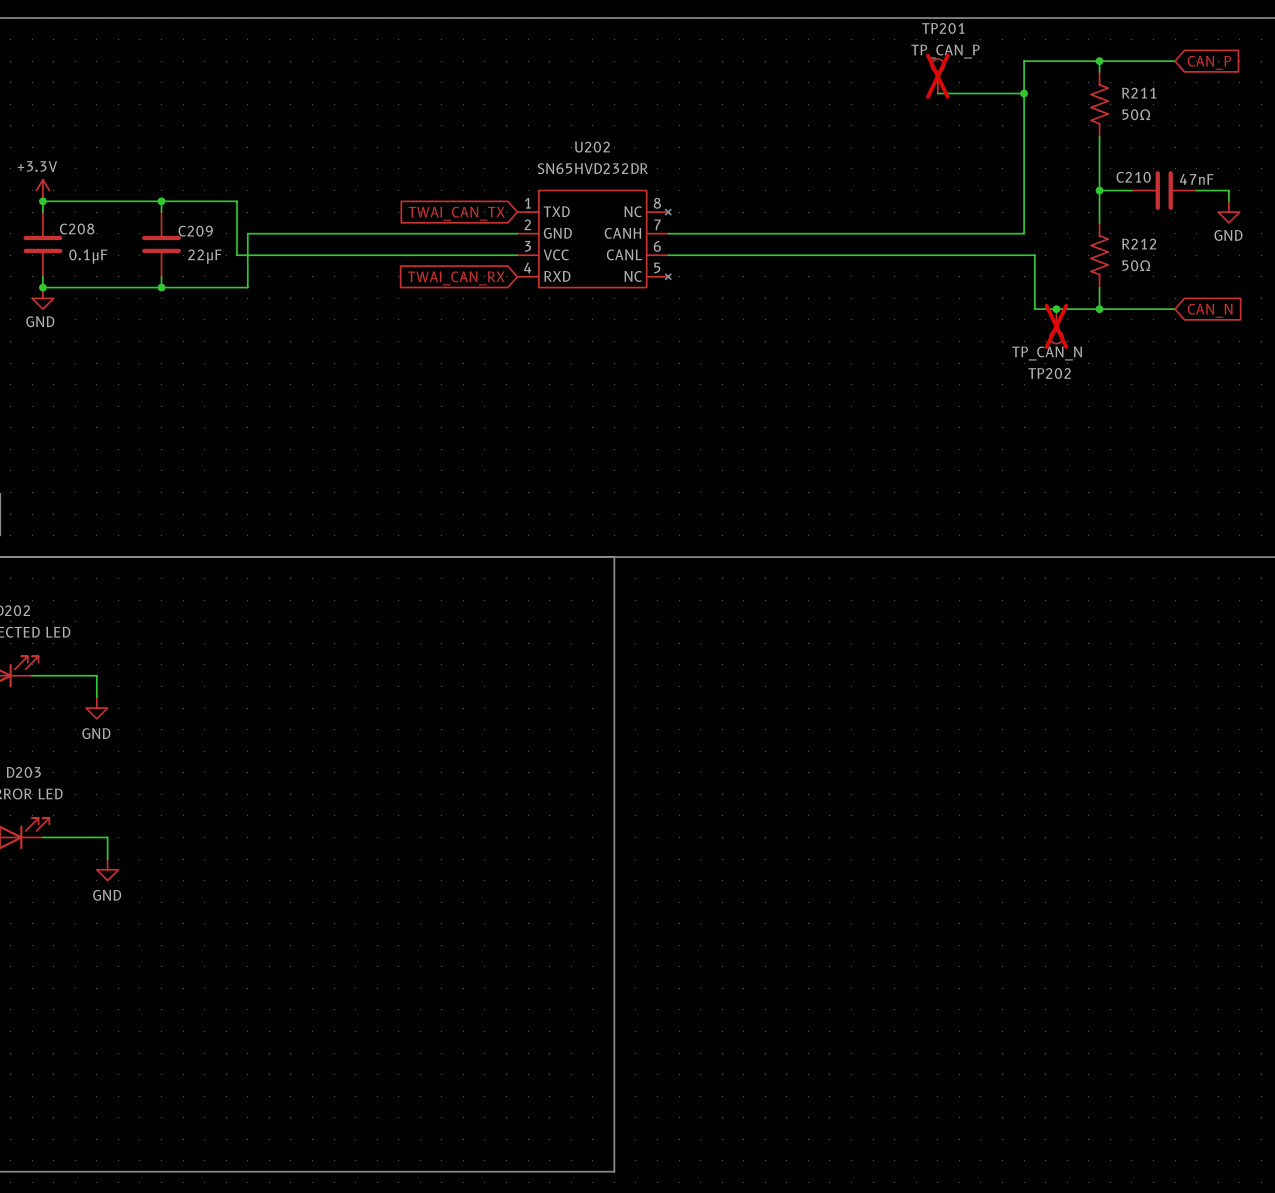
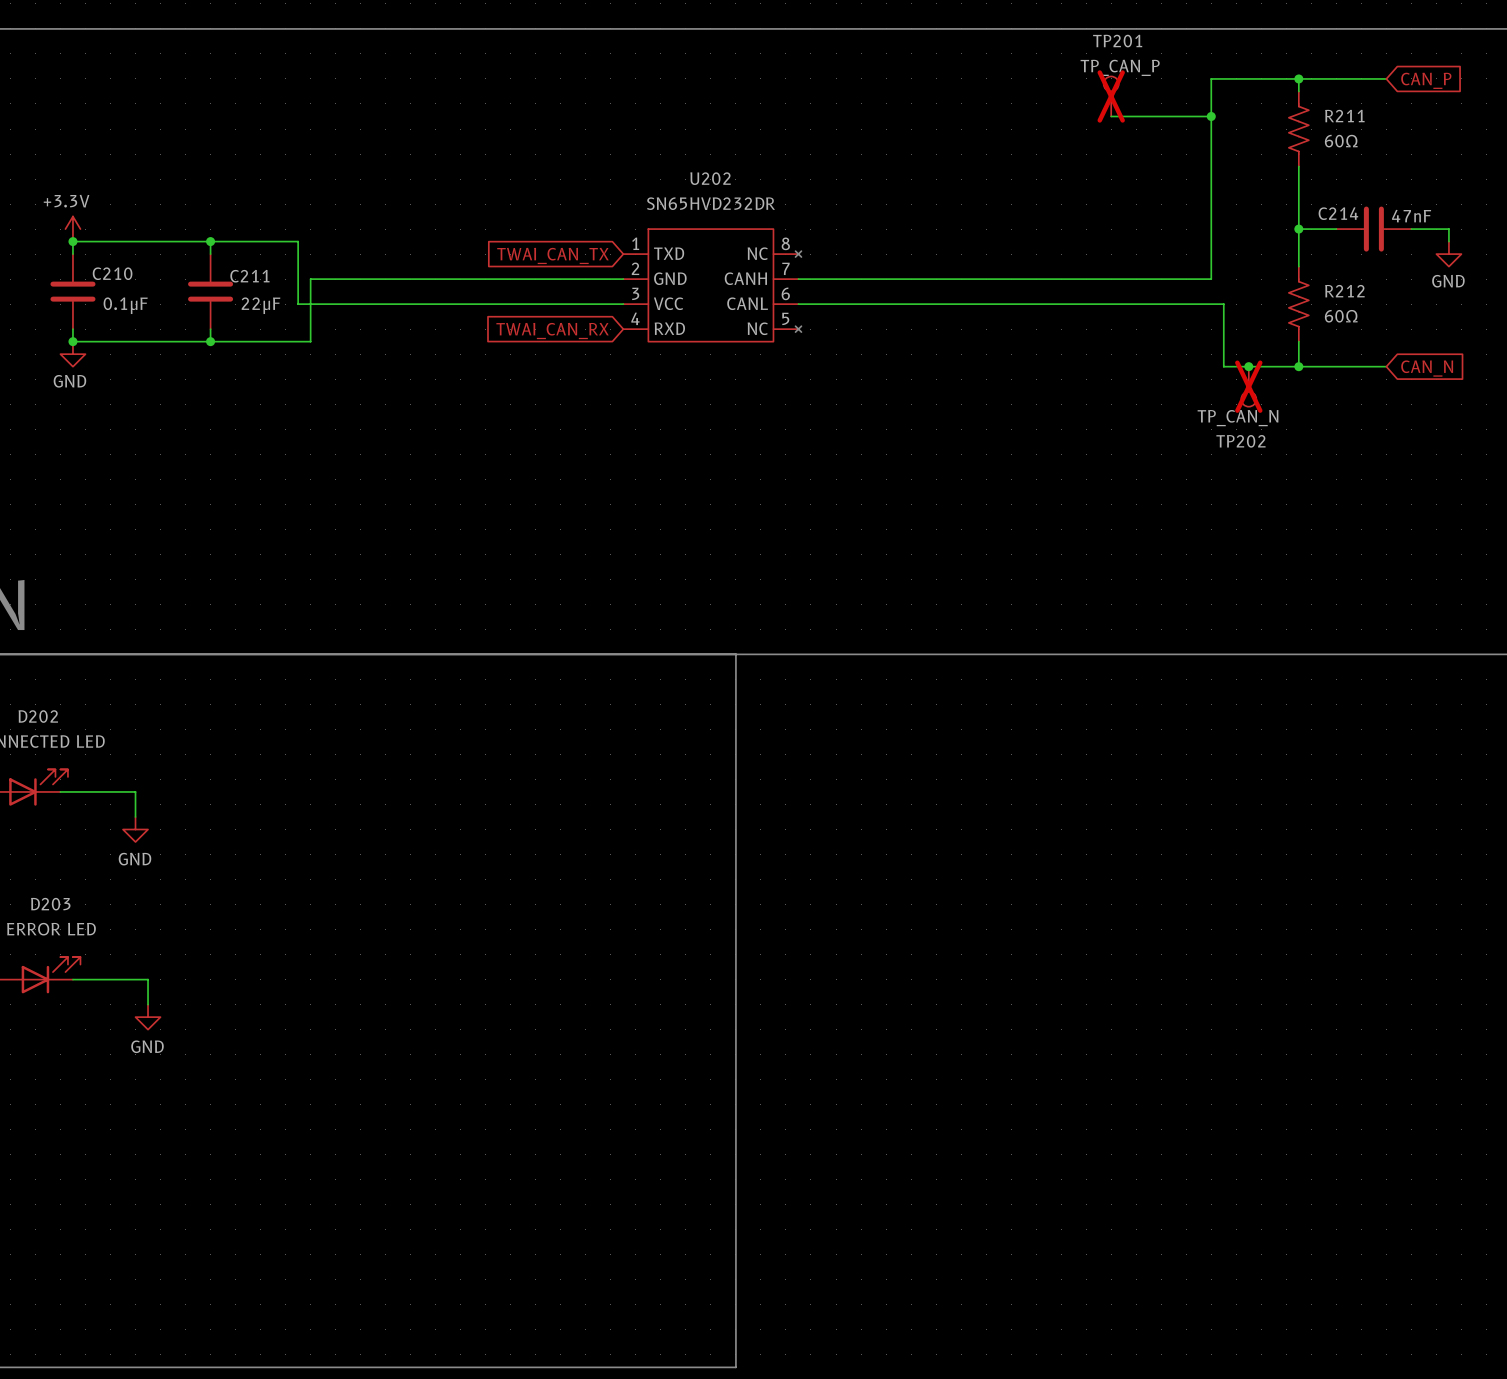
R211 value: 50Ω (1136, 114) -> 60Ω (1341, 141)
C210 name: C210 (1133, 177) -> C214 (1338, 213)
C208 name: C208 (77, 229) -> C210 (112, 273)
C209 name: C209 (195, 231) -> C211 (249, 276)
R212 value: 50Ω (1136, 265) -> 60Ω (1341, 316)

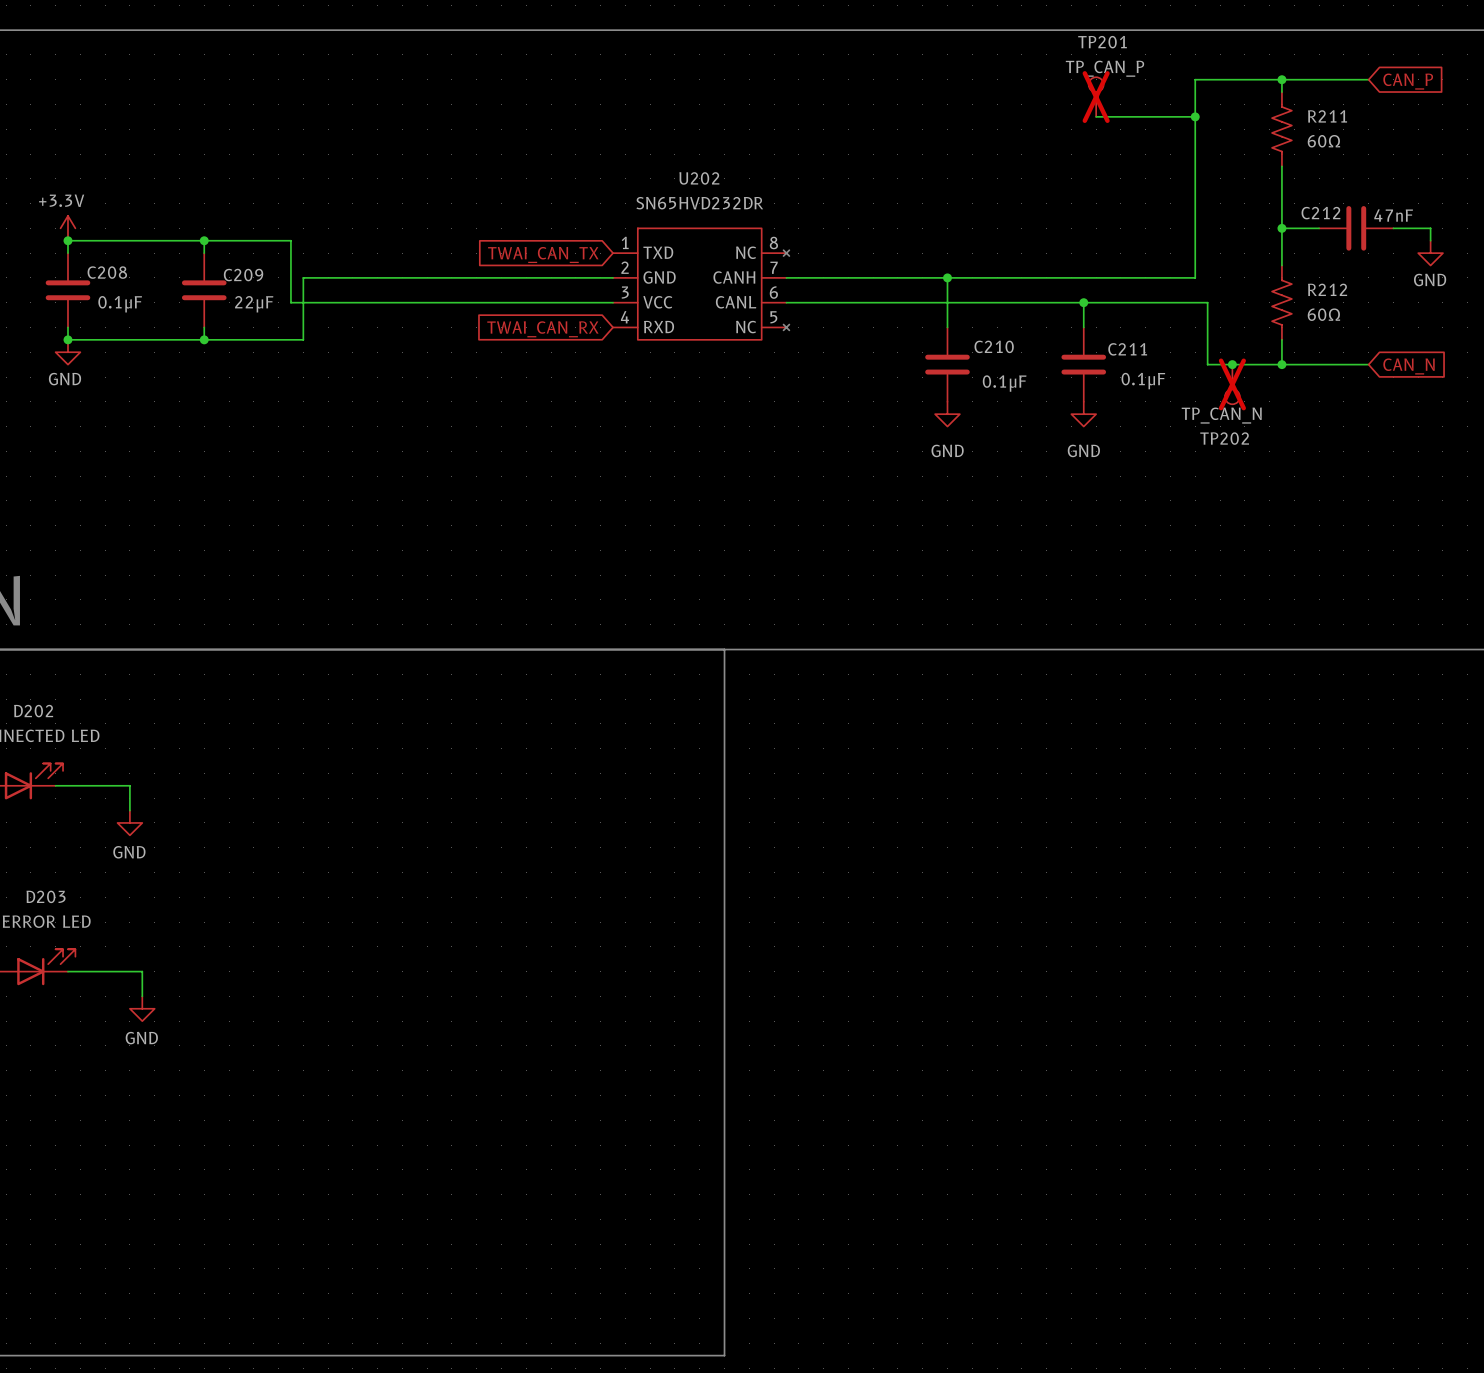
C214 name: C214 (1338, 213) -> C212 (1320, 213)
C210 name: C210 (112, 273) -> C208 (107, 272)
C211 name: C211 (249, 276) -> C209 (243, 275)
wire: none -> (947, 277) (947, 327)
junction: none -> (947, 277)
wire: none -> (1083, 302) (1083, 327)
junction: none -> (1083, 302)
C210: none -> 0.1μF (947, 364)
C211: none -> 0.1μF (1083, 364)
power symbol: none -> GND (947, 414)
power symbol: none -> GND (1083, 414)

